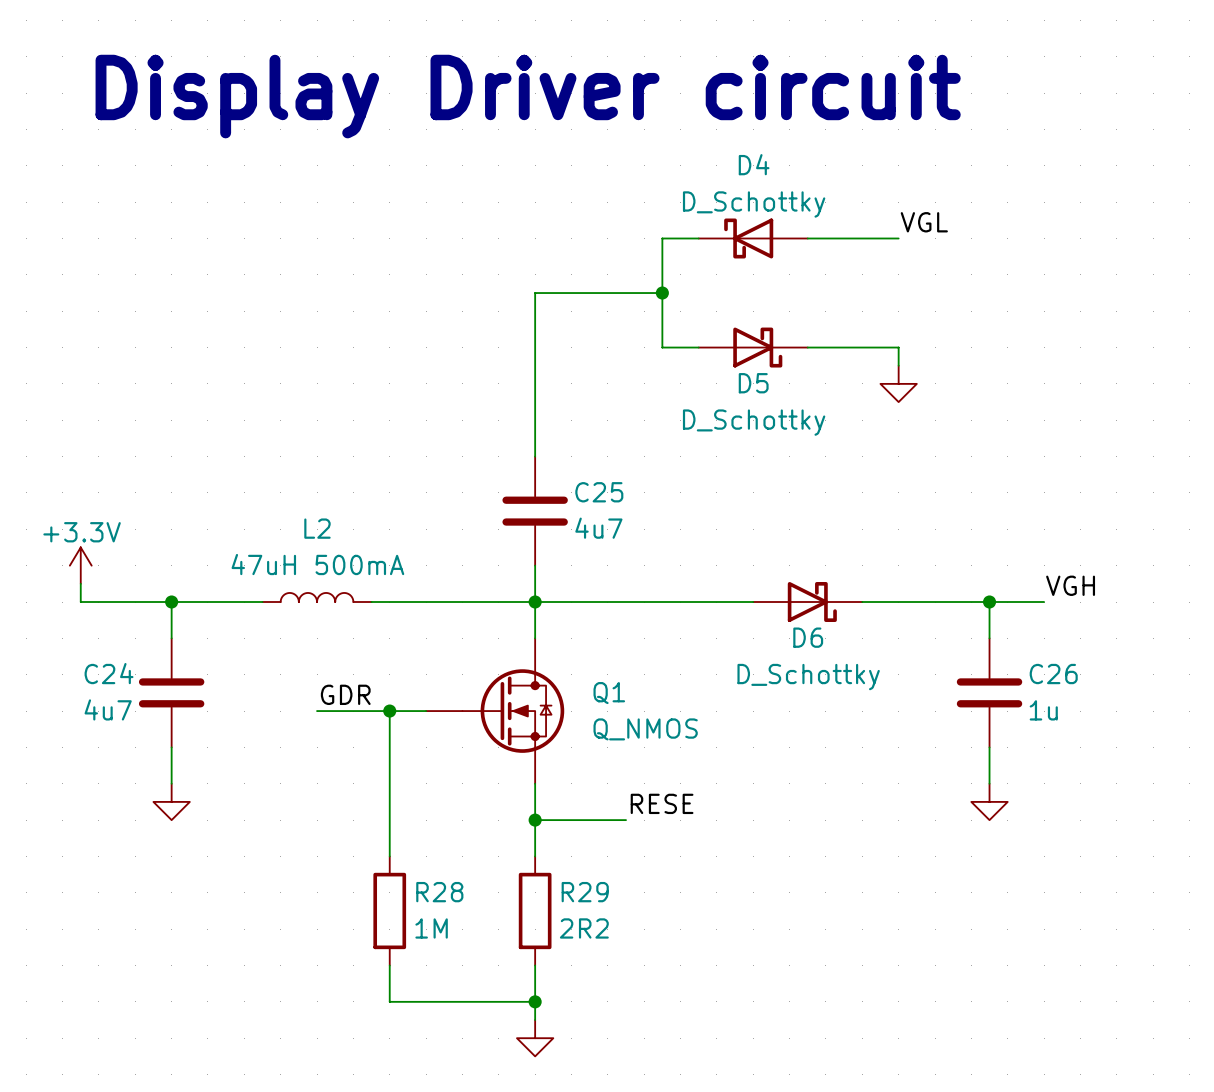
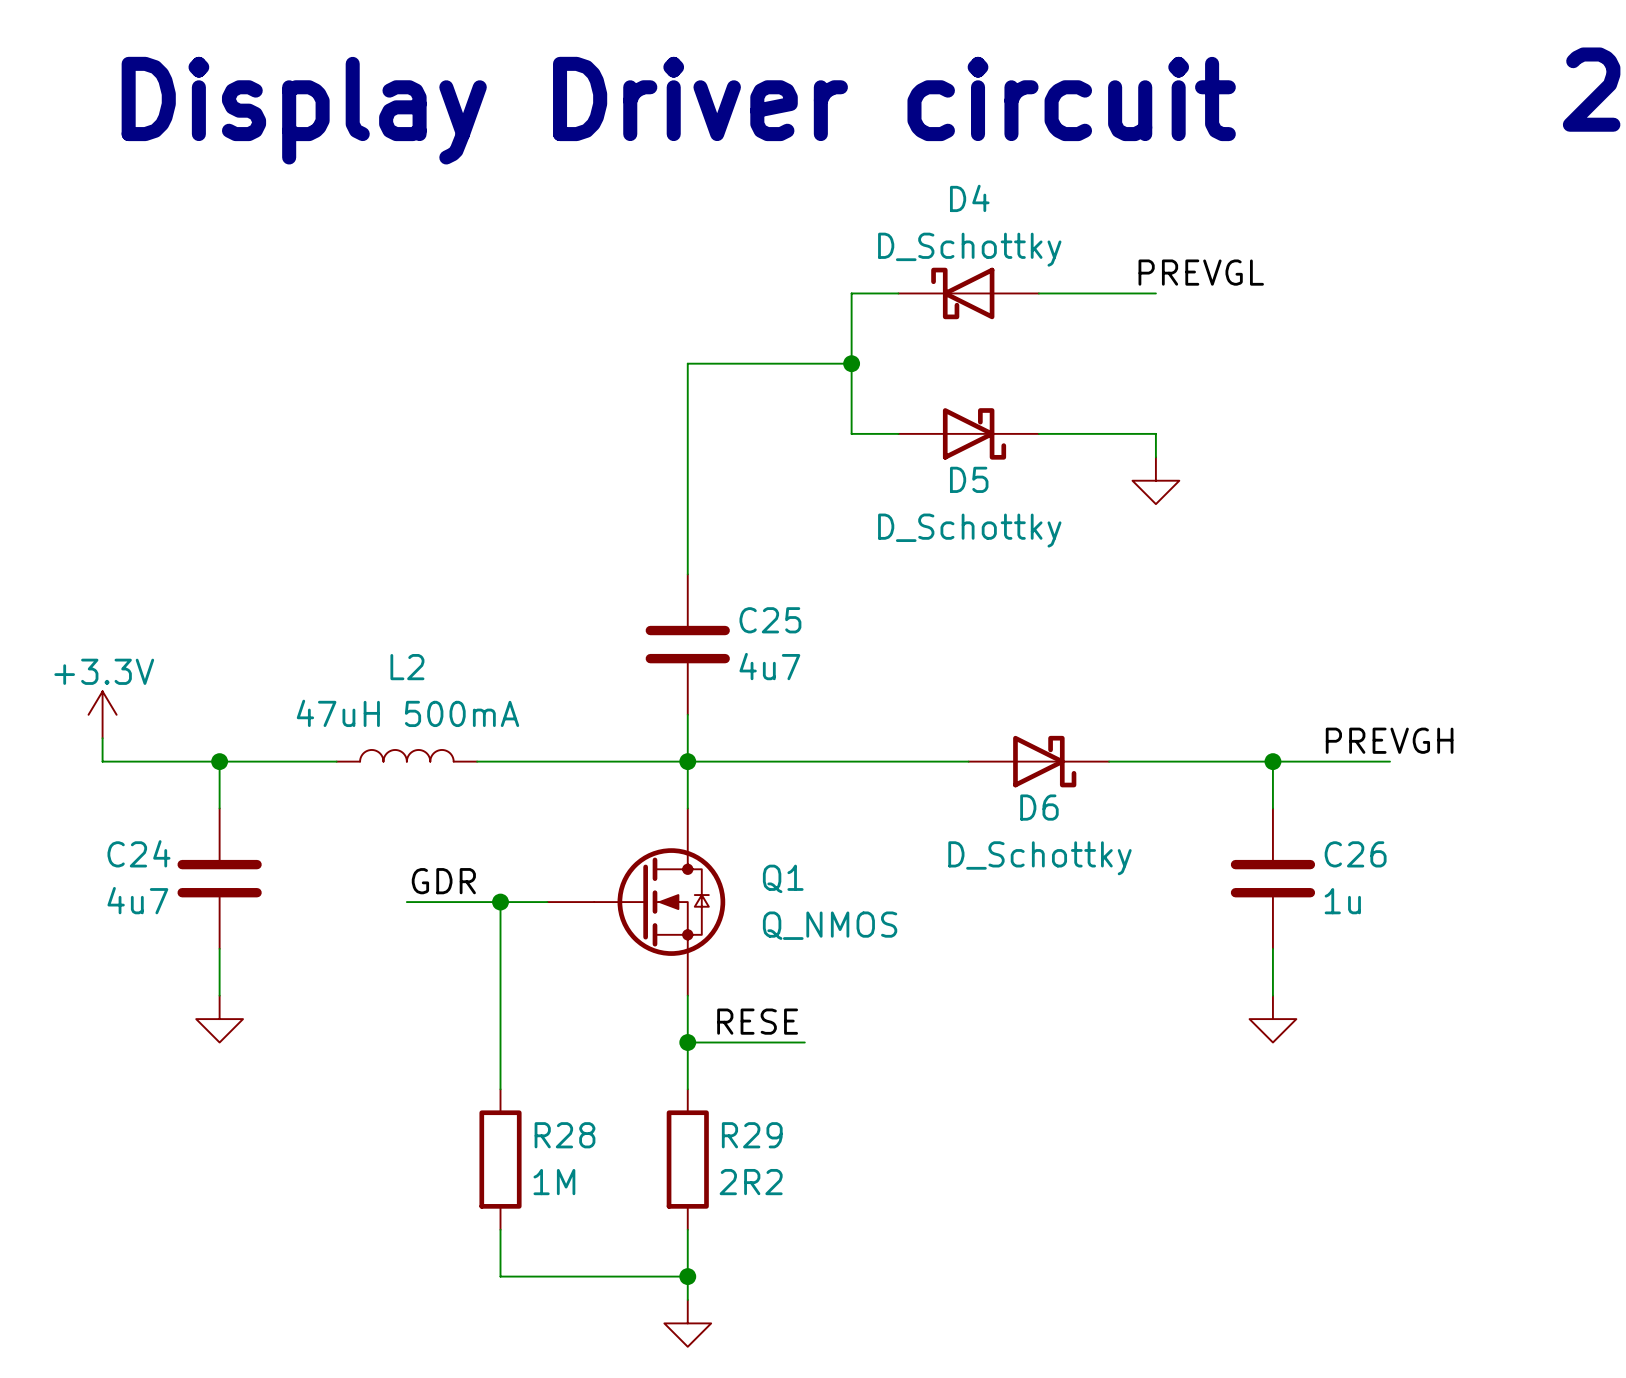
label: VGL (924, 222) -> PREVGL (1201, 272)
label: VGH (1070, 585) -> PREVGH (1389, 740)
wire: none -> (1343, 761) (1389, 761)
label position: RESE (662, 803) -> RESE (757, 1021)

